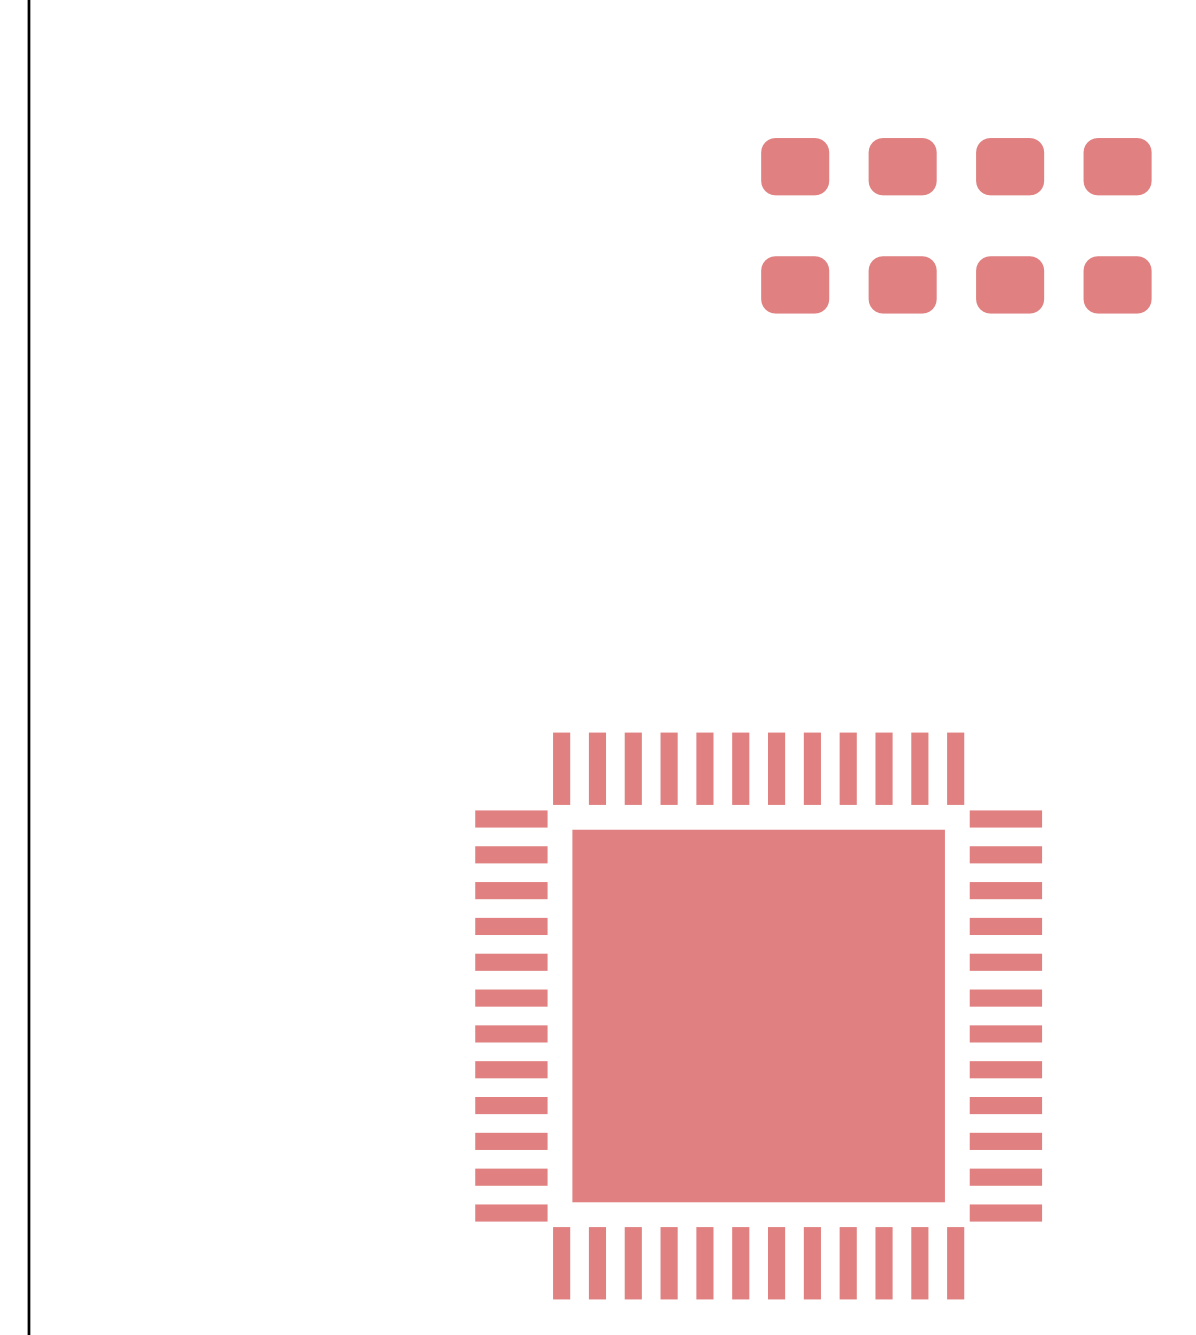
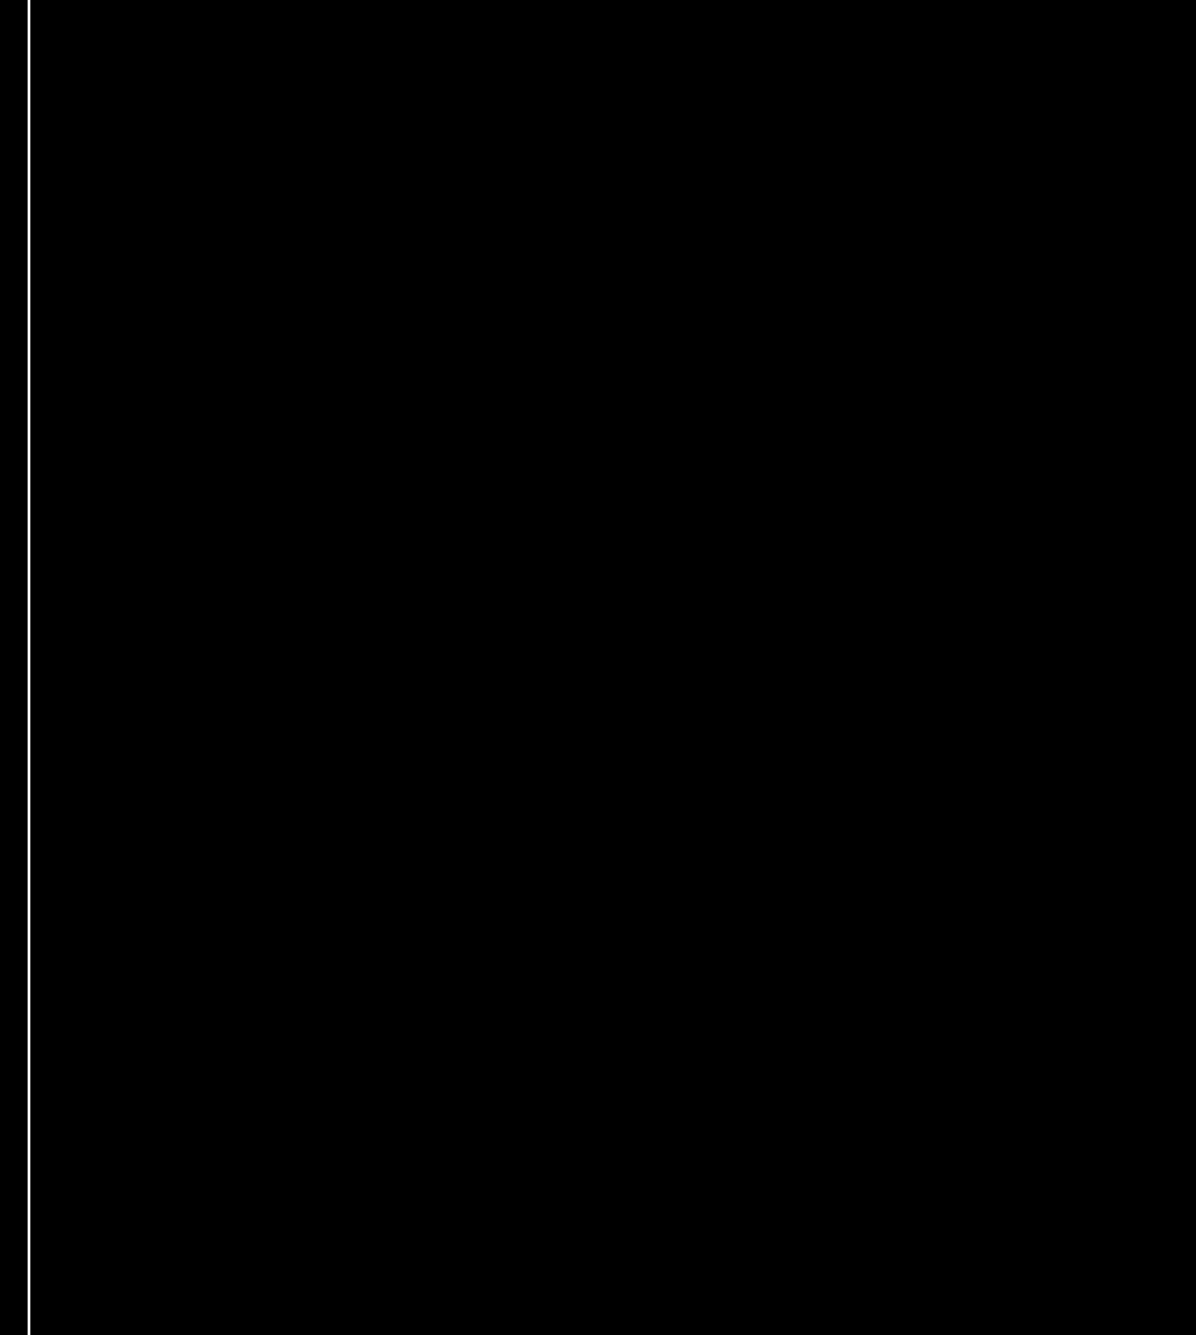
part: (795, 225) -> none
part: (902, 225) -> none
part: (1010, 225) -> none
part: (1117, 225) -> none
part: (758, 1016) -> none

